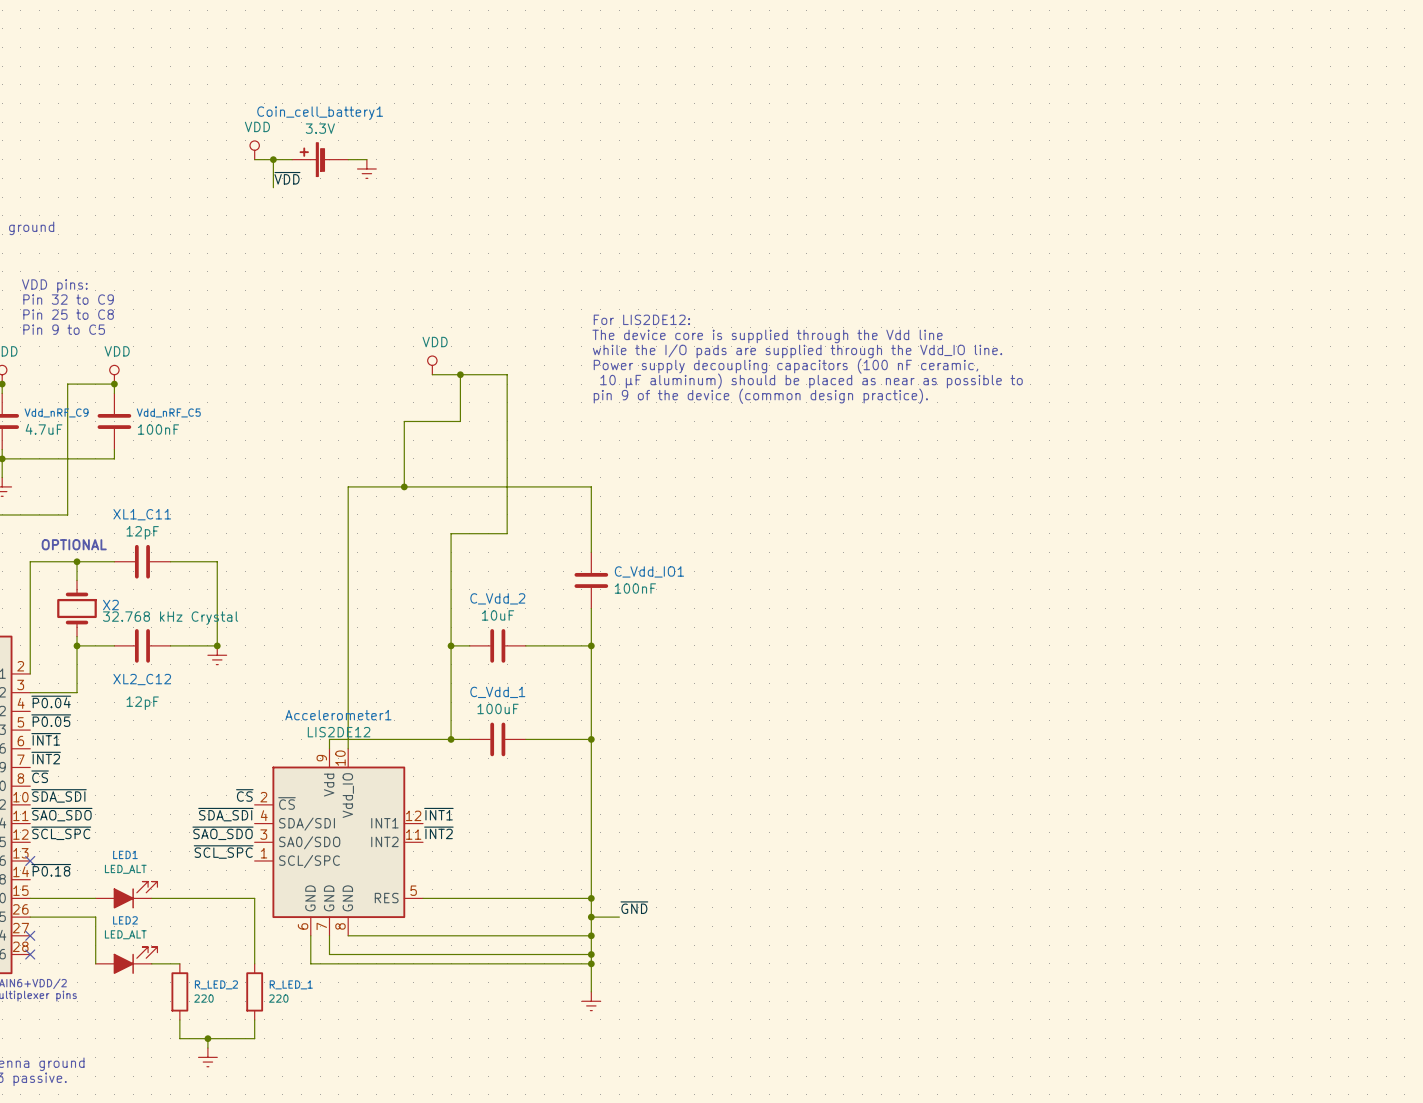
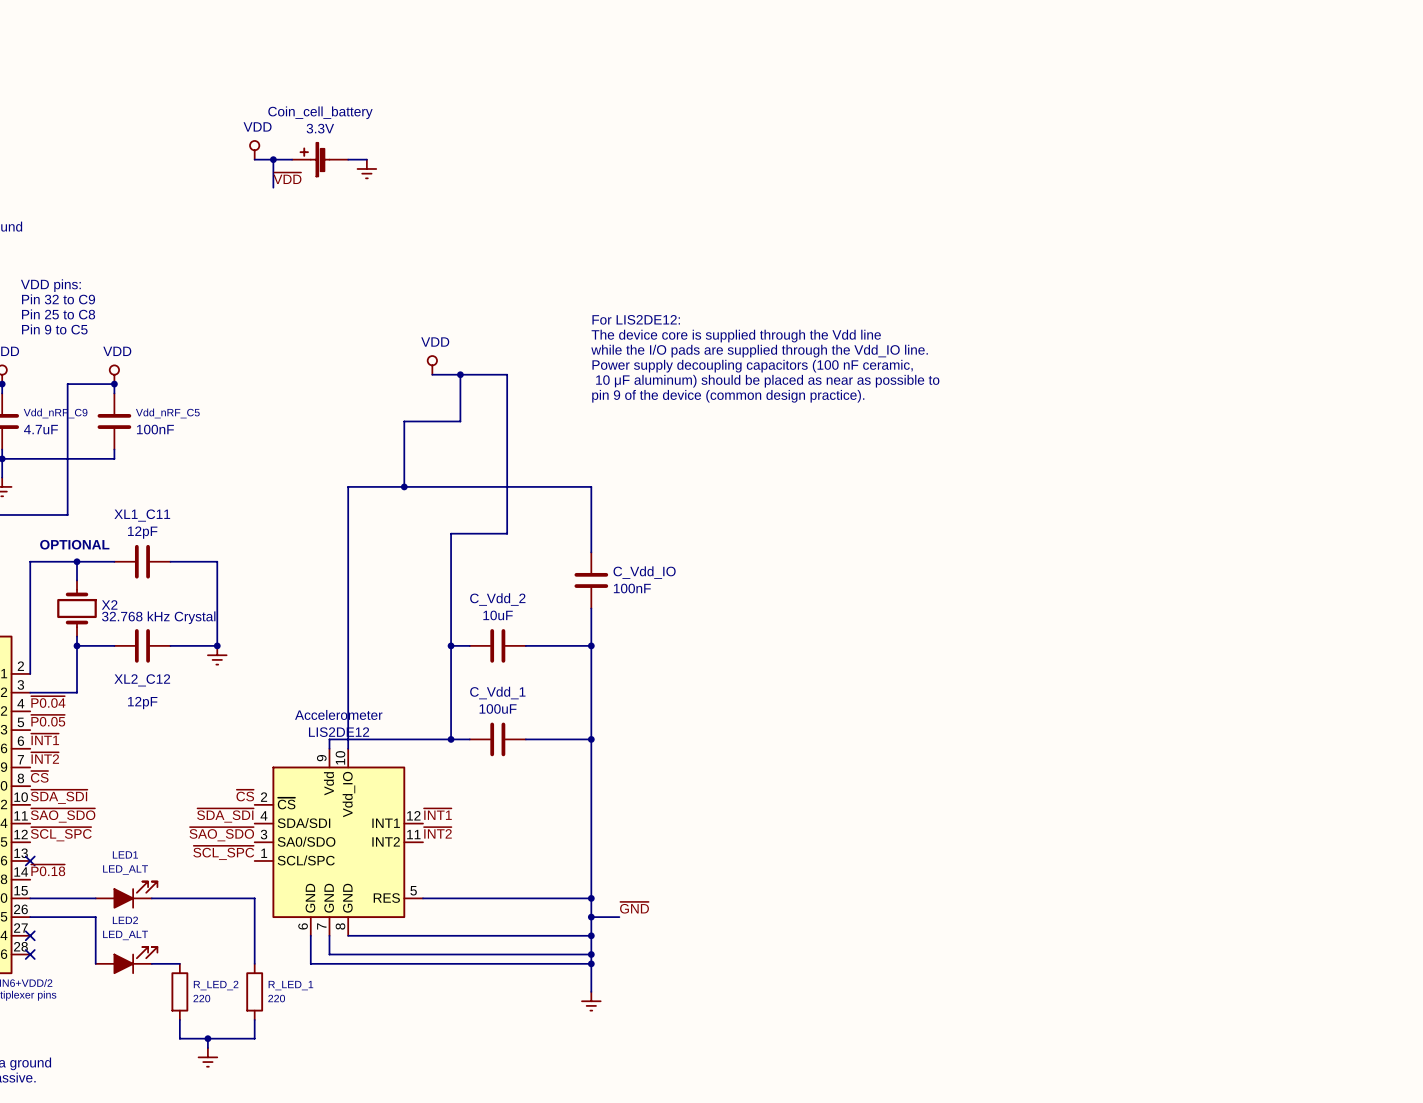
Coin_cell_battery1 name: Coin_cell_battery1 (320, 113) -> Coin_cell_battery (320, 112)
C_Vdd_IO1 name: C_Vdd_IO1 (649, 571) -> C_Vdd_IO (644, 572)
Accelerometer1 name: Accelerometer1 (338, 715) -> Accelerometer (338, 714)

